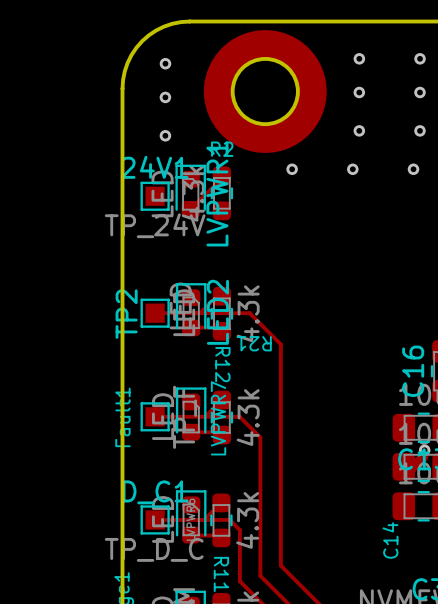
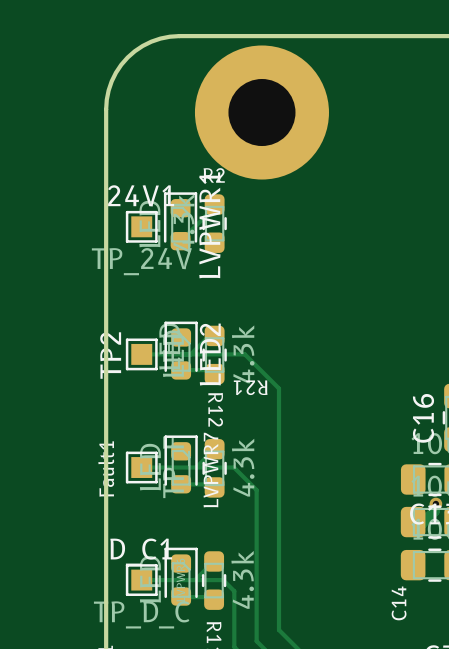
via: (359, 58) -> none
via: (420, 58) -> none
via: (165, 63) -> none
via: (359, 92) -> none
via: (419, 92) -> none
via: (165, 97) -> none
via: (359, 130) -> none
via: (419, 130) -> none
via: (165, 135) -> none
via: (292, 169) -> none
via: (352, 169) -> none
via: (413, 169) -> none

